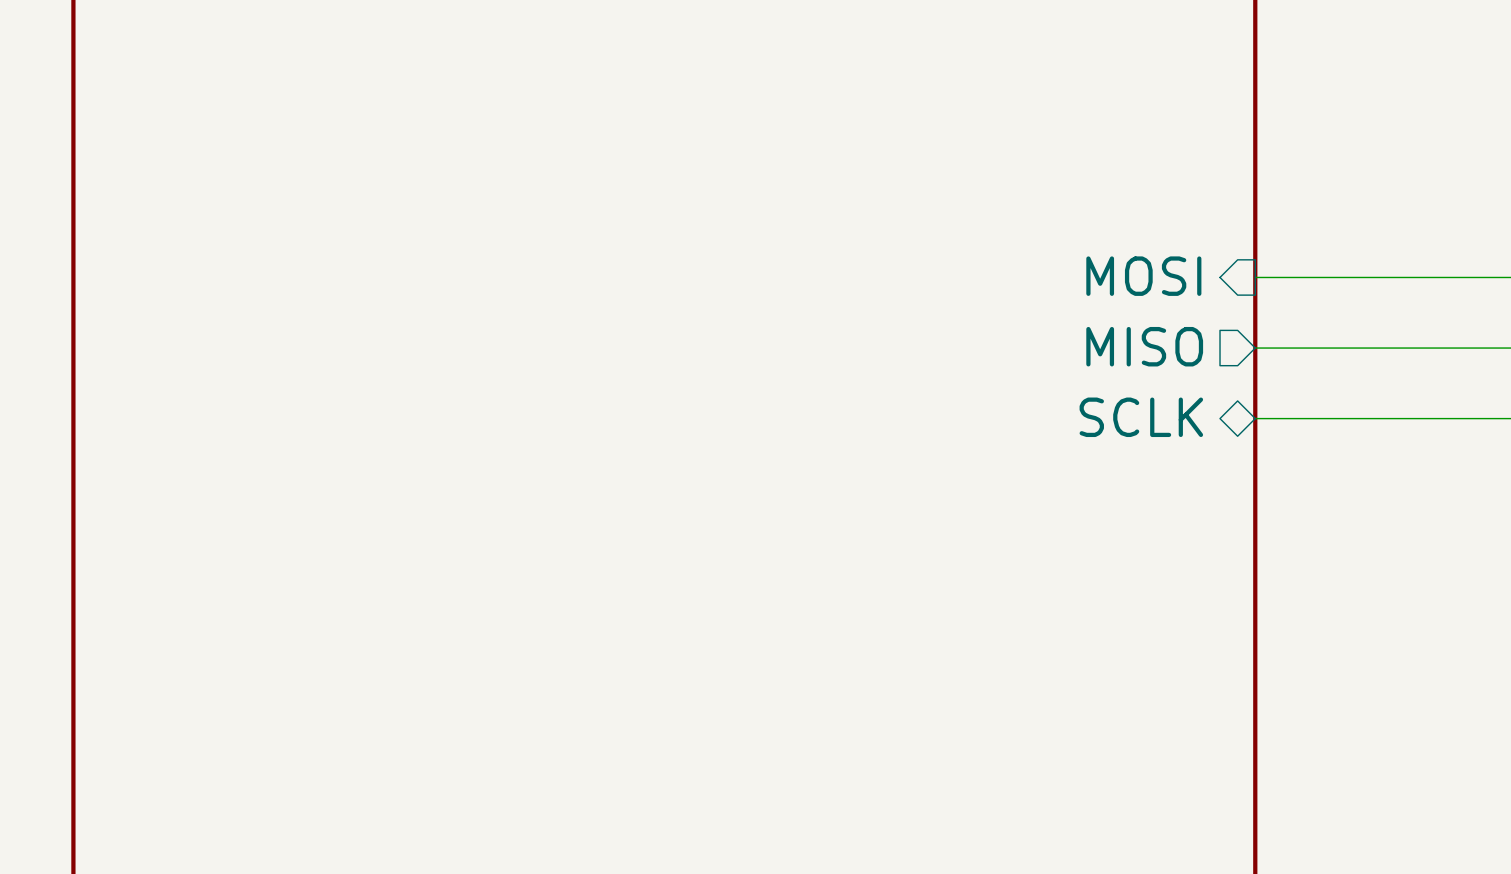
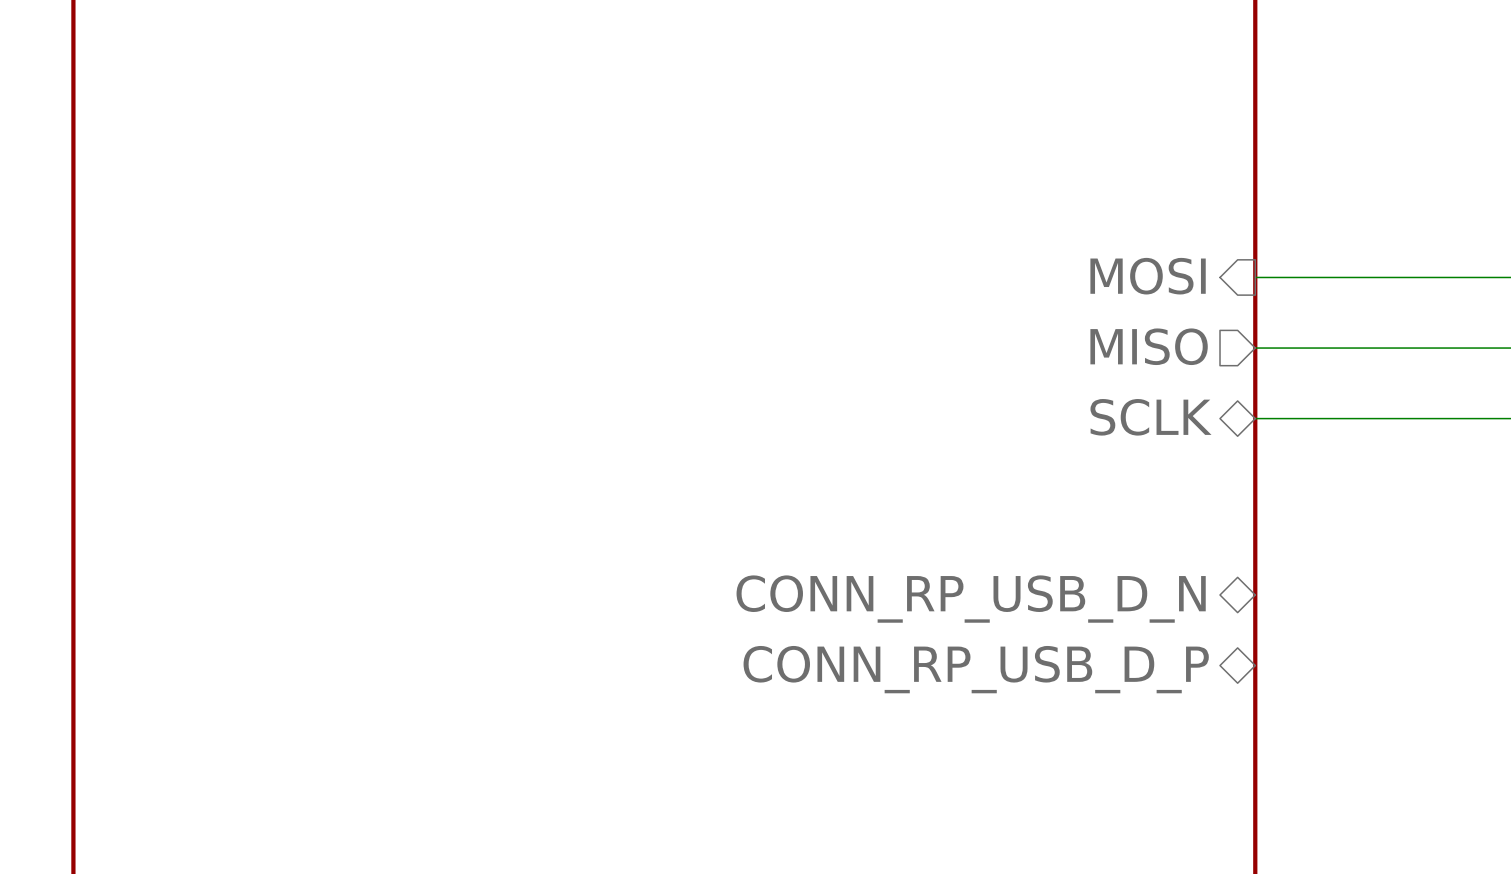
sheet pin: none -> CONN_RP_USB_D_N (971, 599)
sheet pin: none -> CONN_RP_USB_D_P (976, 669)

